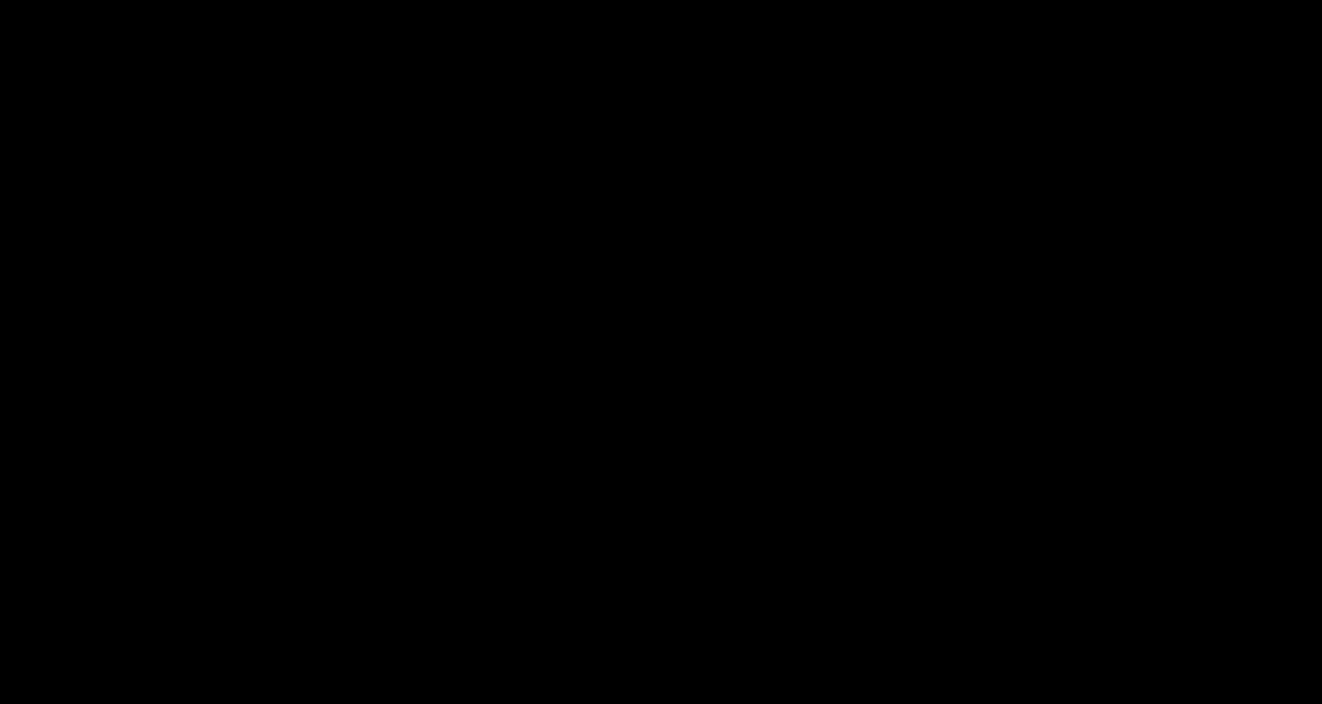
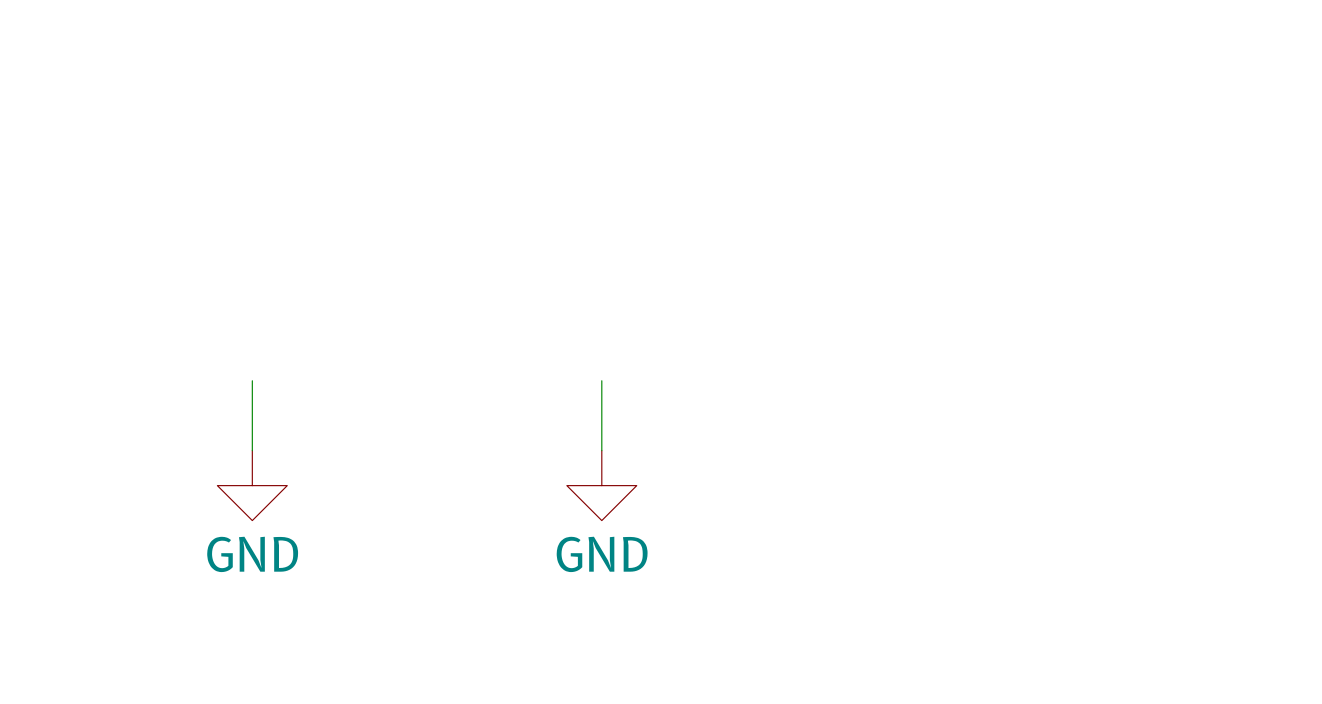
wire: none -> (252, 380) (252, 450)
wire: none -> (601, 380) (601, 450)
power symbol: none -> GND (252, 485)
power symbol: none -> GND (601, 485)

